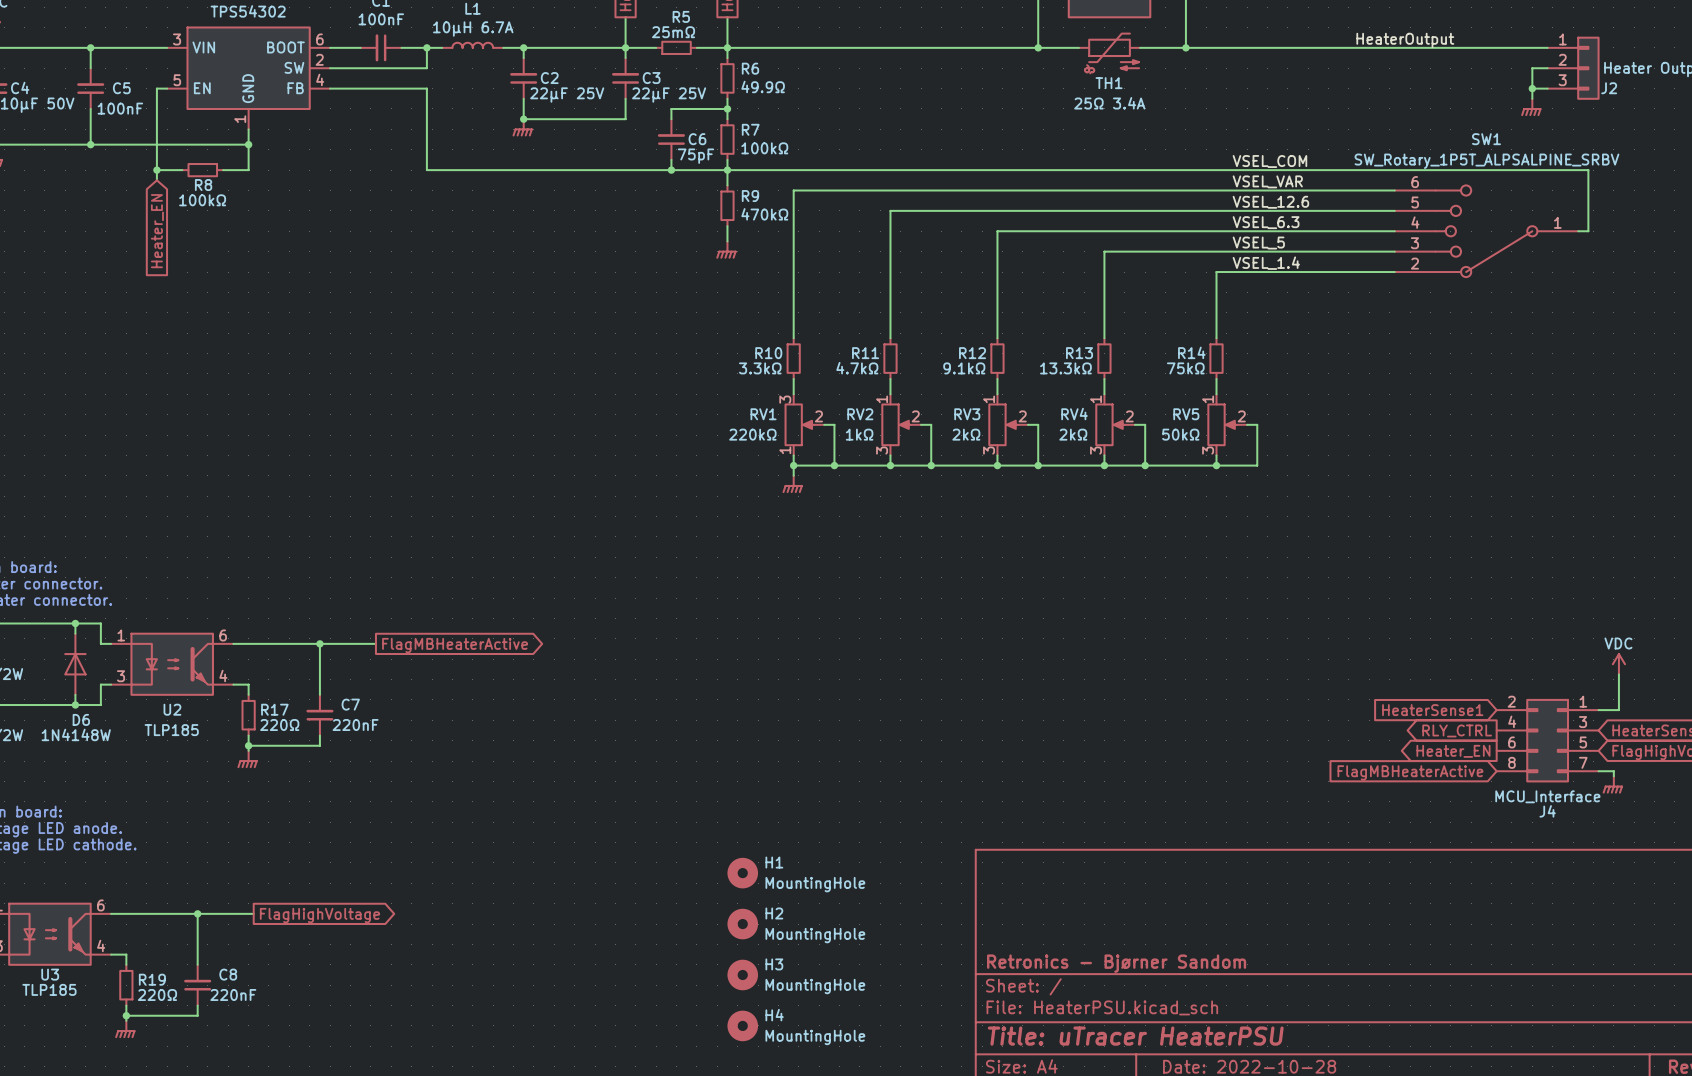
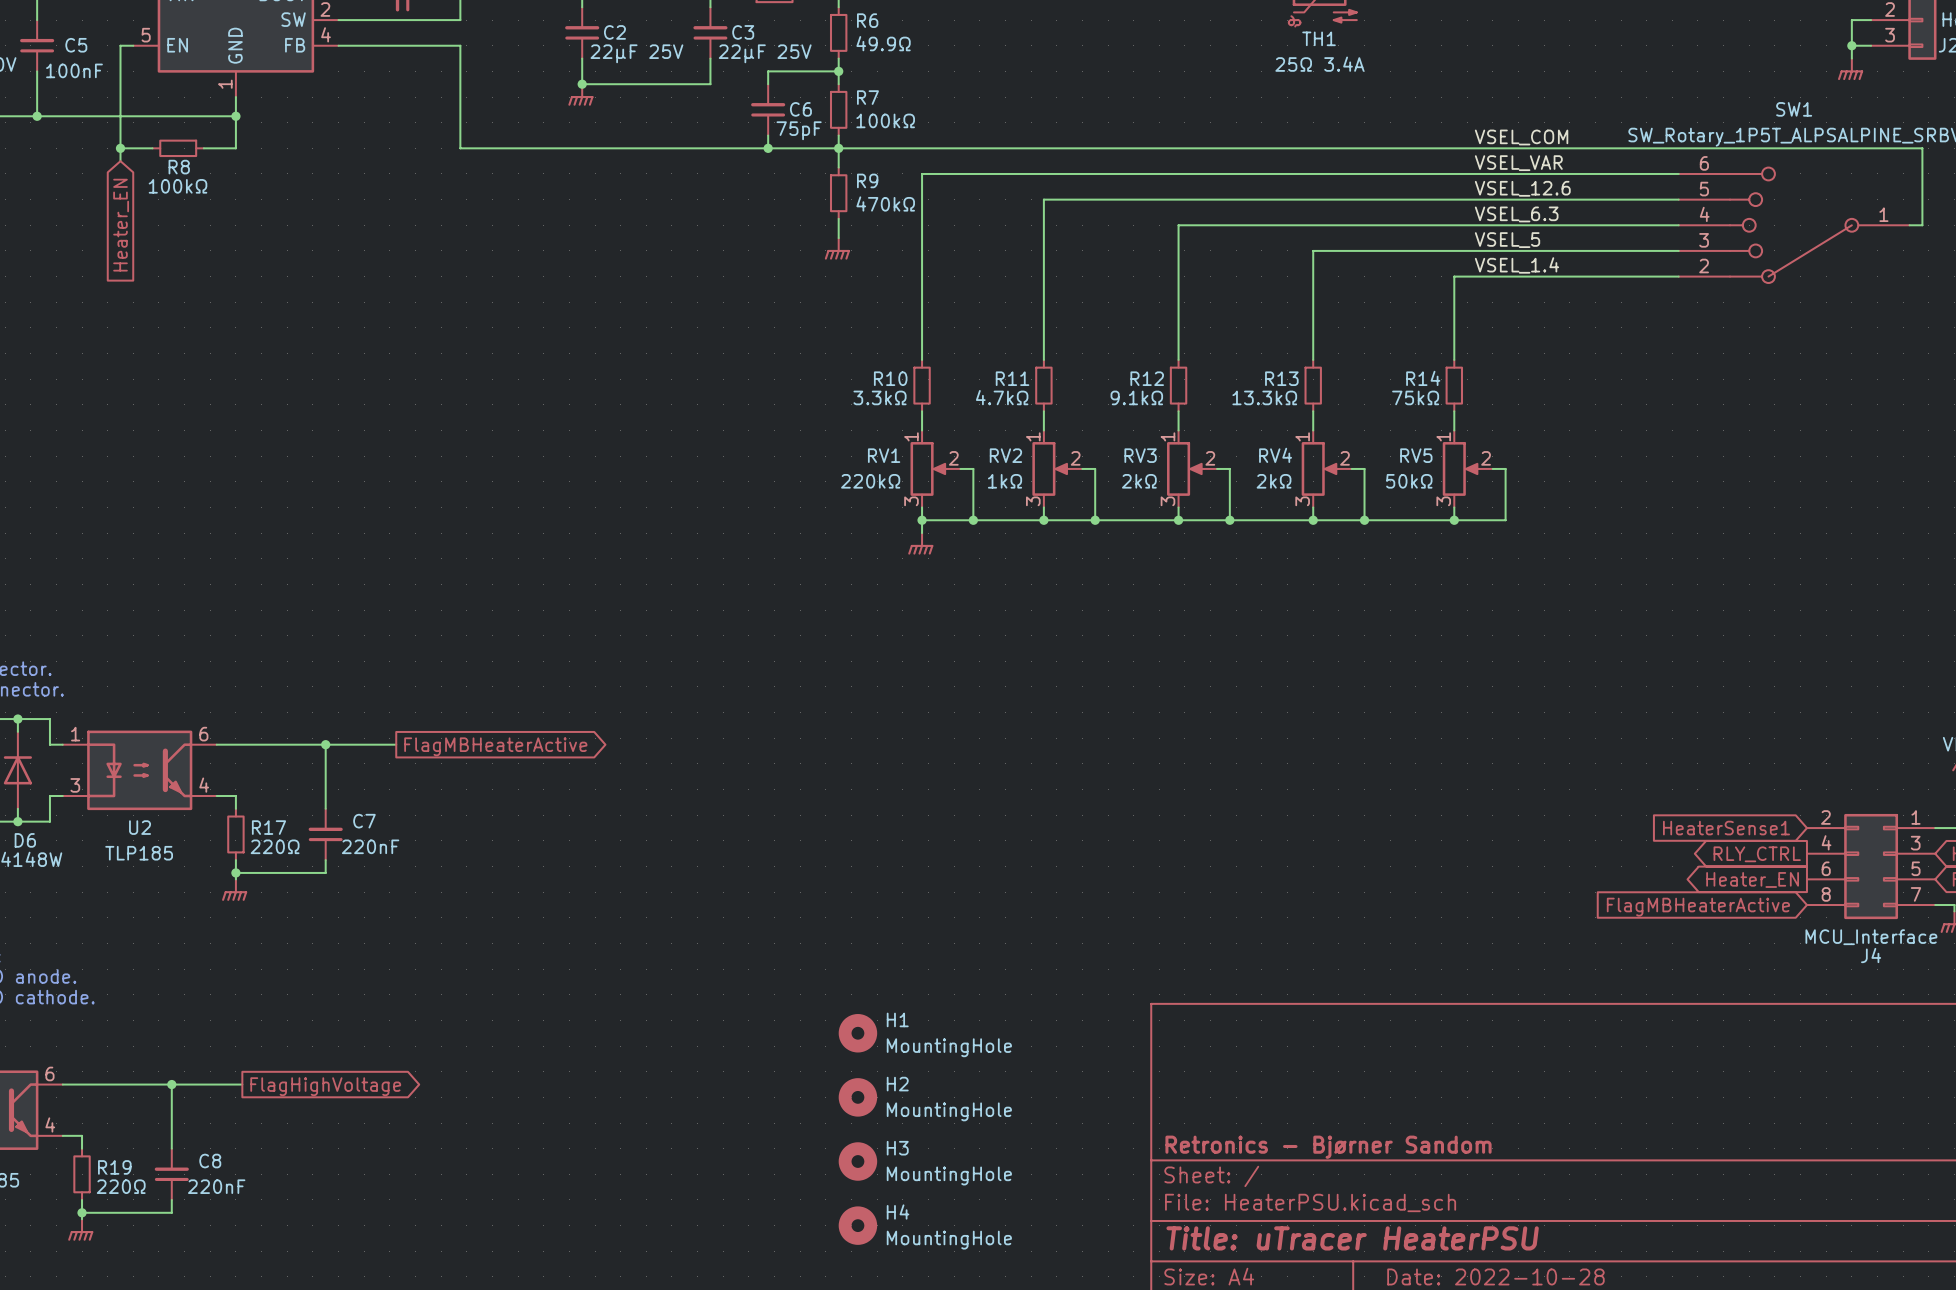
RV1 flip: as is (799, 424) -> up-down (929, 468)

